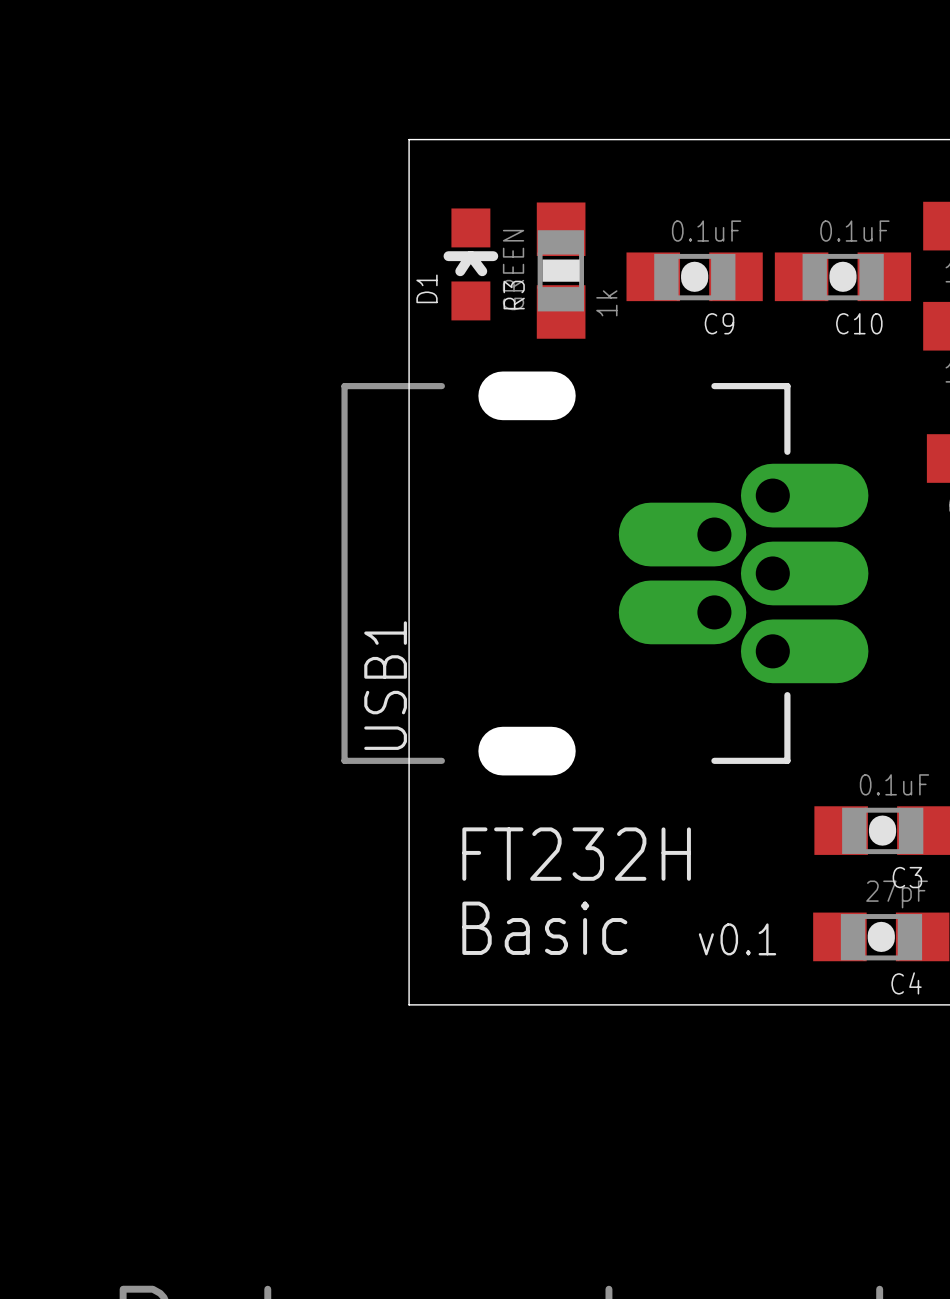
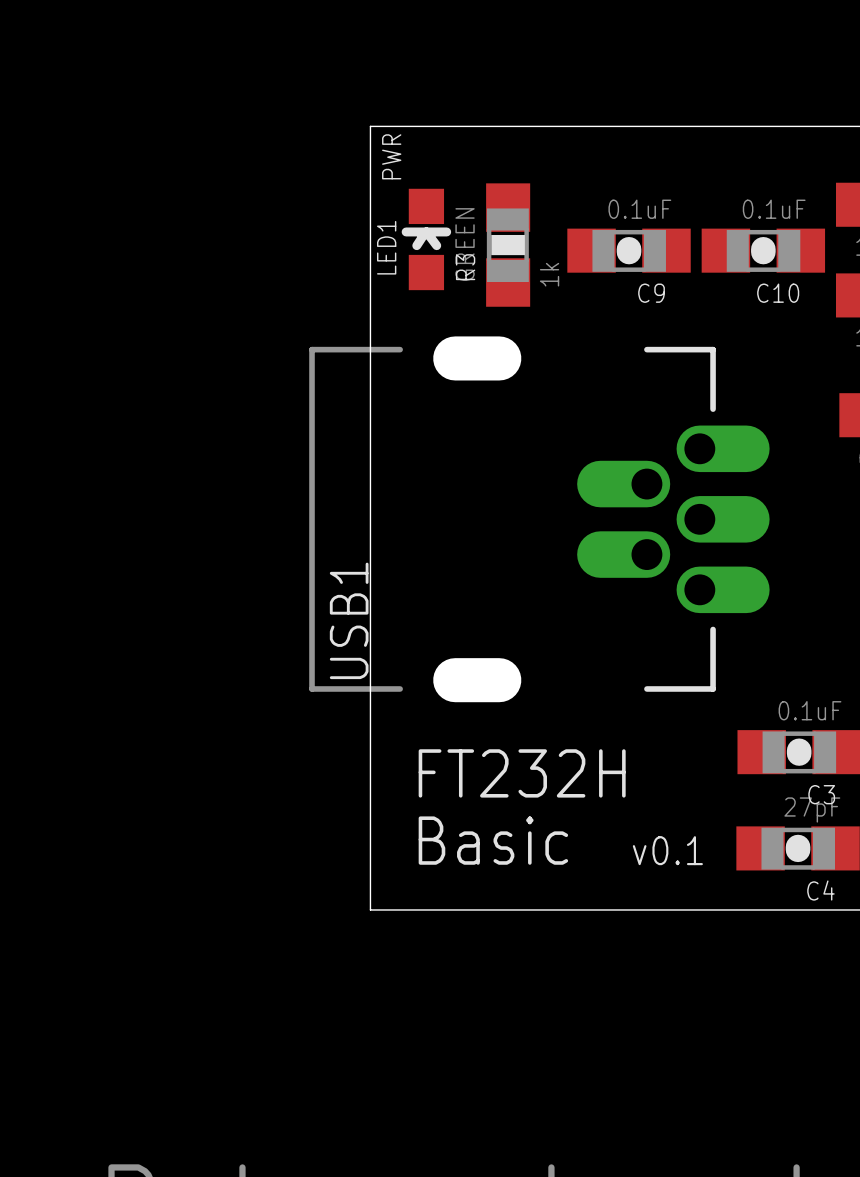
text: none -> PWR (391, 156)
D1 name: D1 (427, 288) -> LED1 (386, 247)
USB1 footprint: [341, 371, 869, 776] -> [309, 336, 770, 703]

